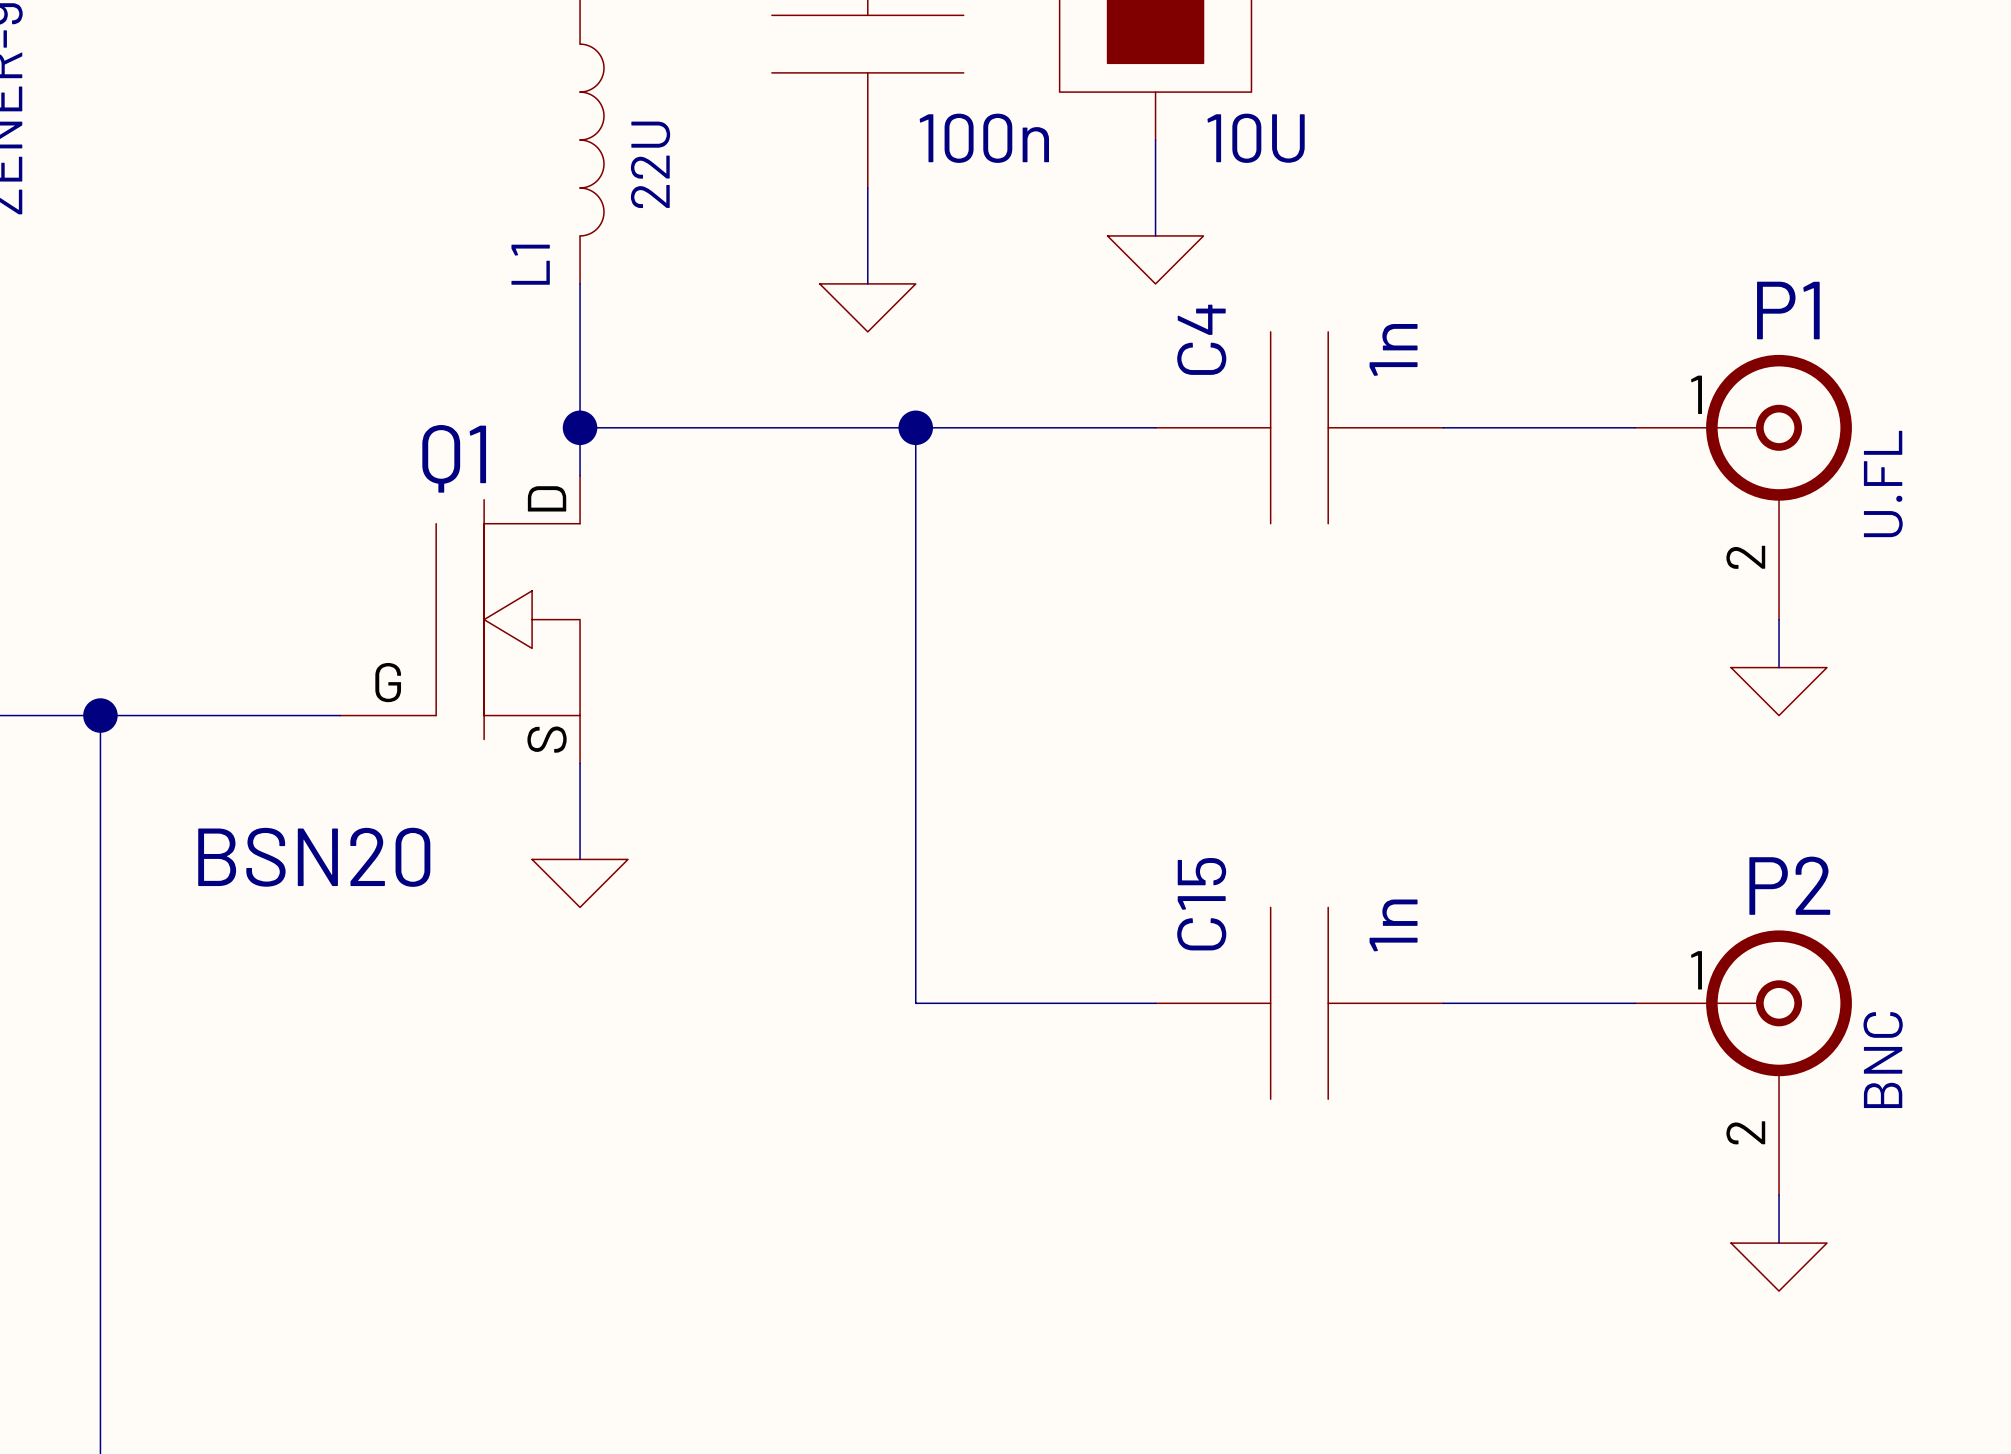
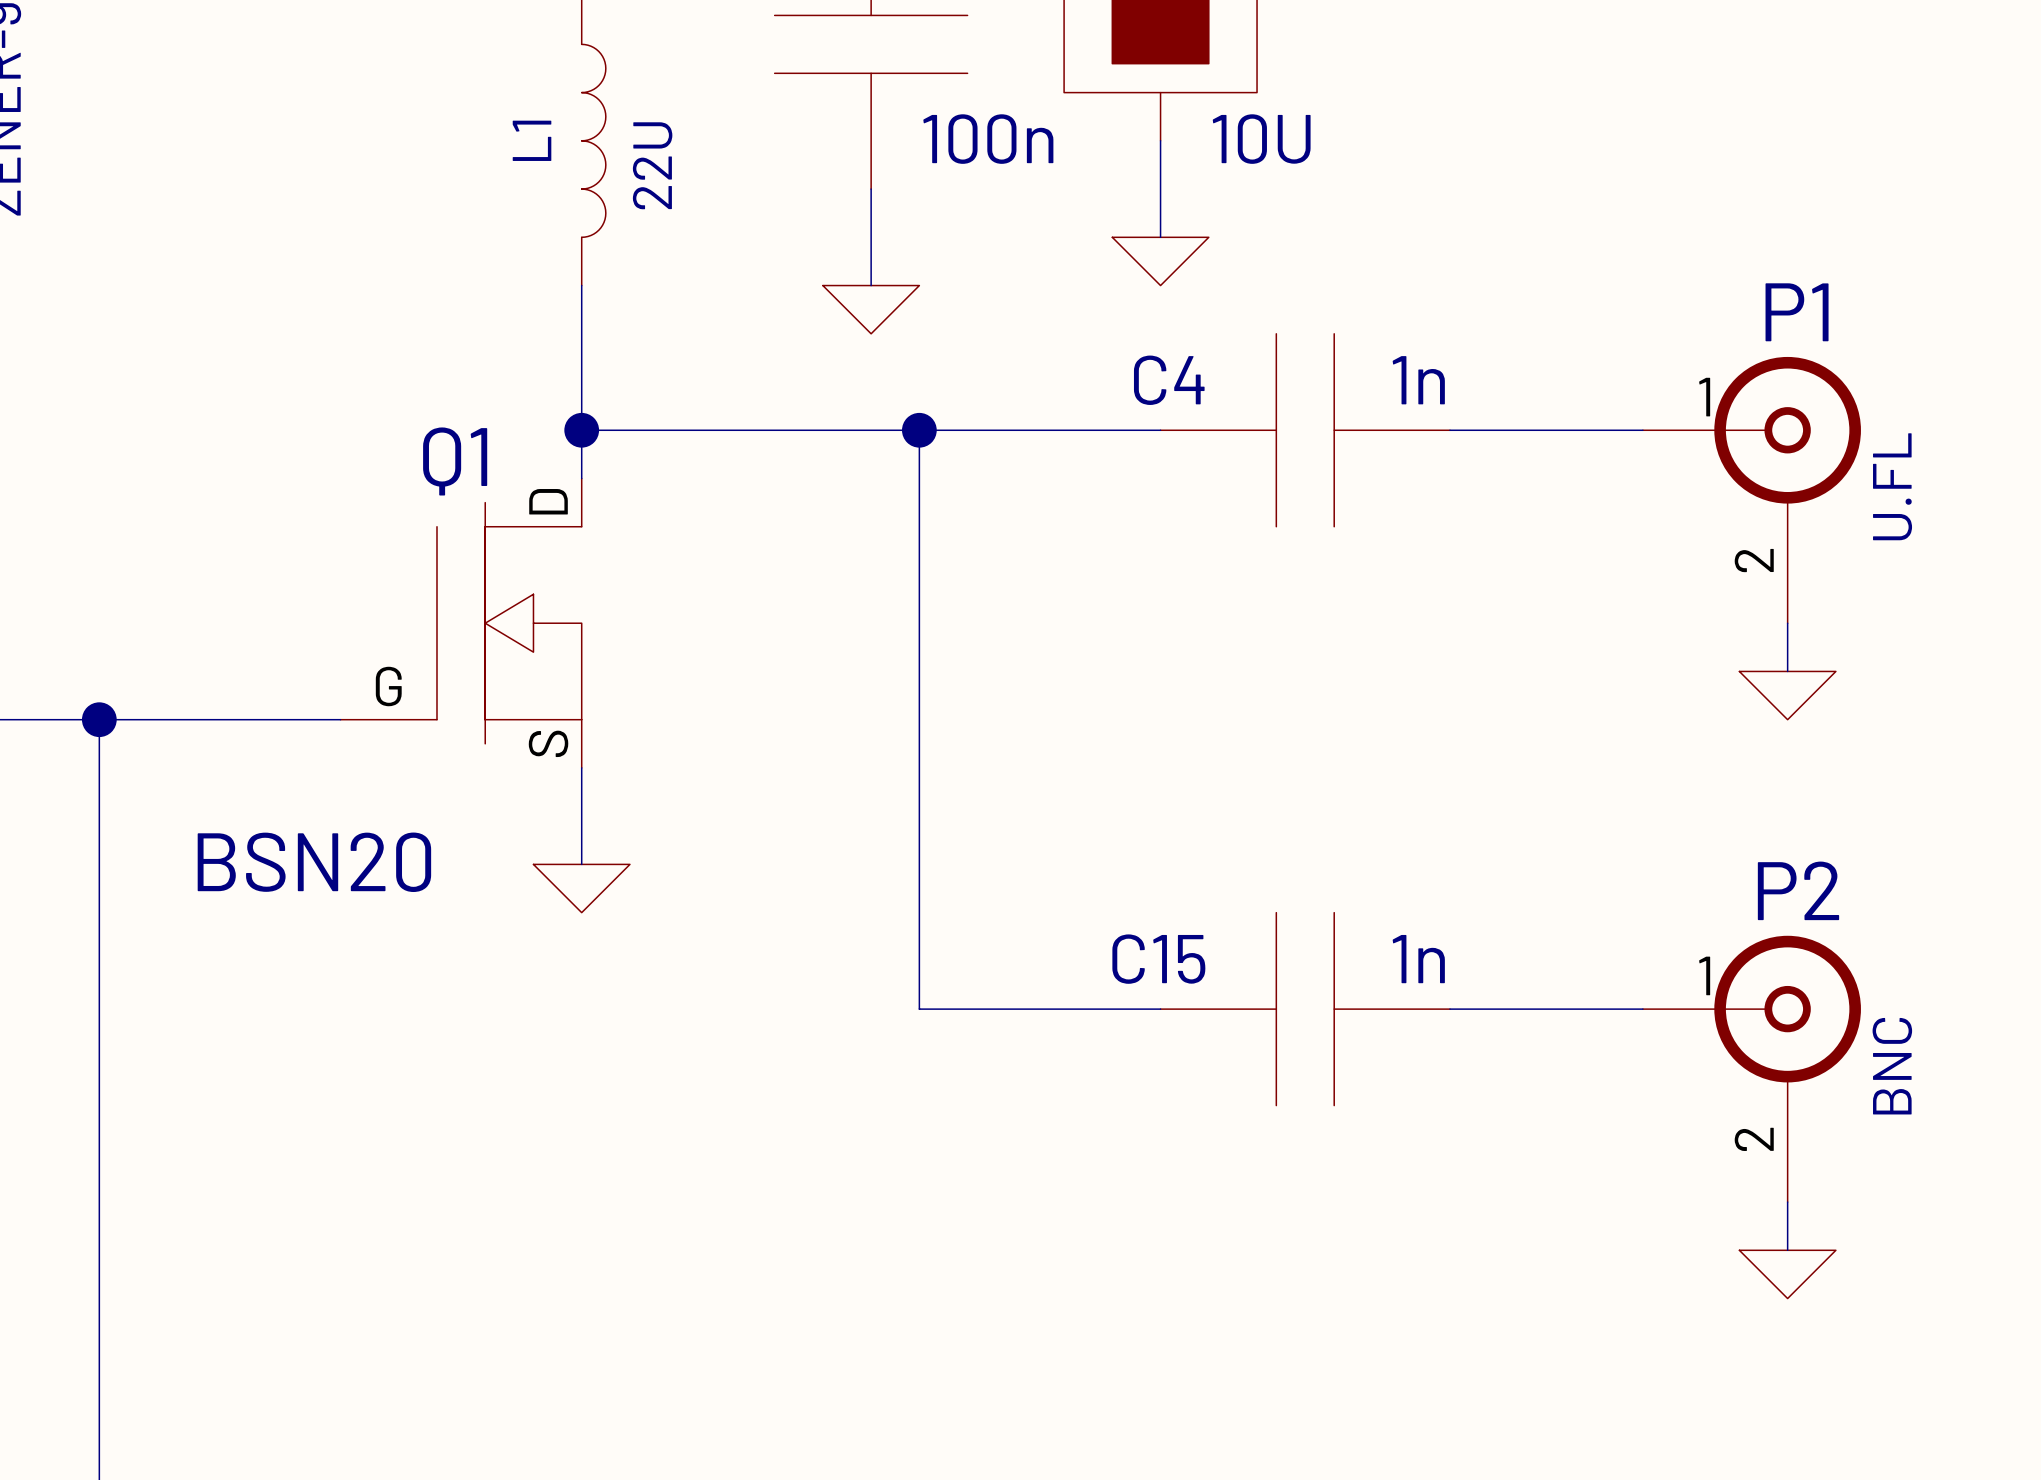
L1 name position: L1 (530, 264) -> L1 (532, 140)
C4 name rotation: 0° (1201, 339) -> 90° clockwise (1169, 380)
C4 value rotation: 0° (1393, 349) -> 90° clockwise (1418, 380)
C15 name rotation: 0° (1201, 904) -> 90° clockwise (1158, 959)
C15 value rotation: 0° (1393, 925) -> 90° clockwise (1418, 959)

